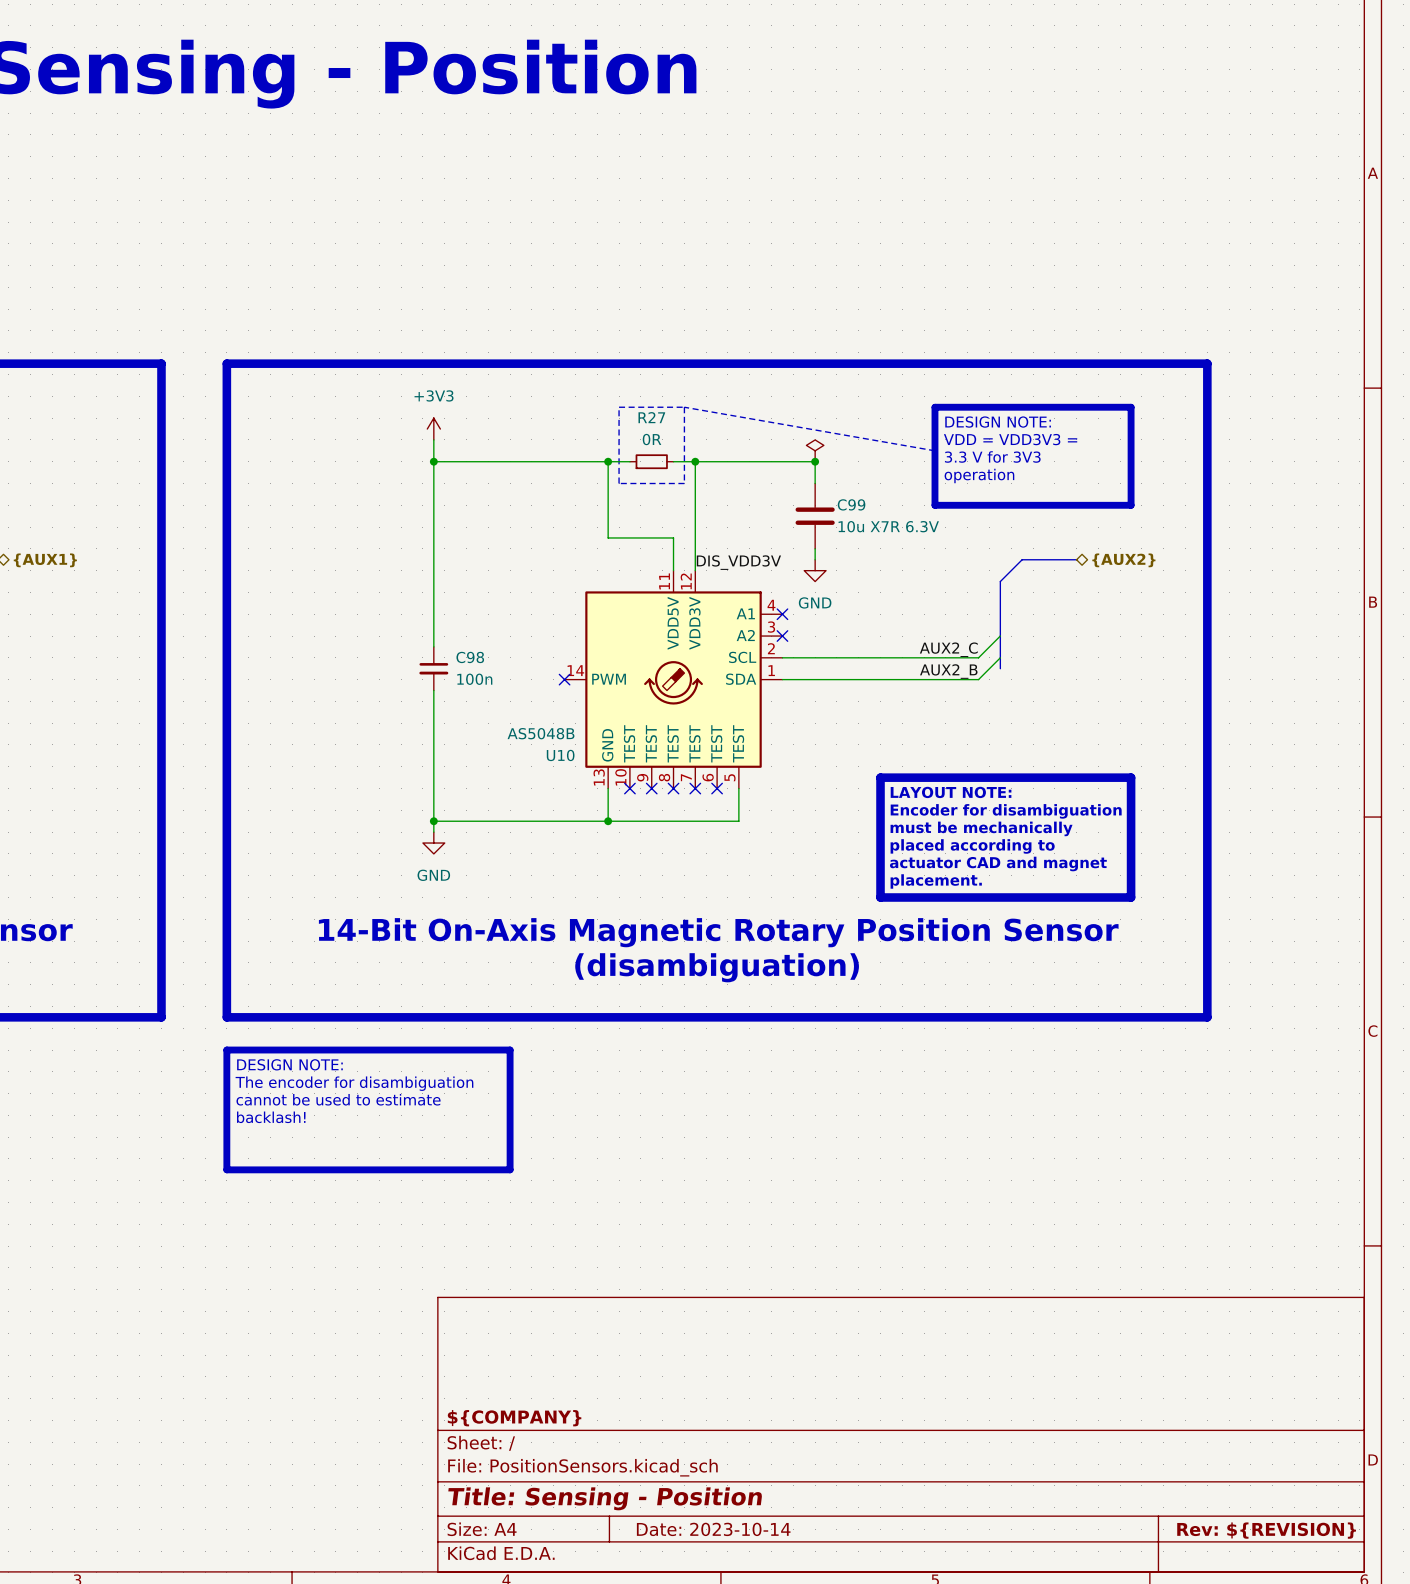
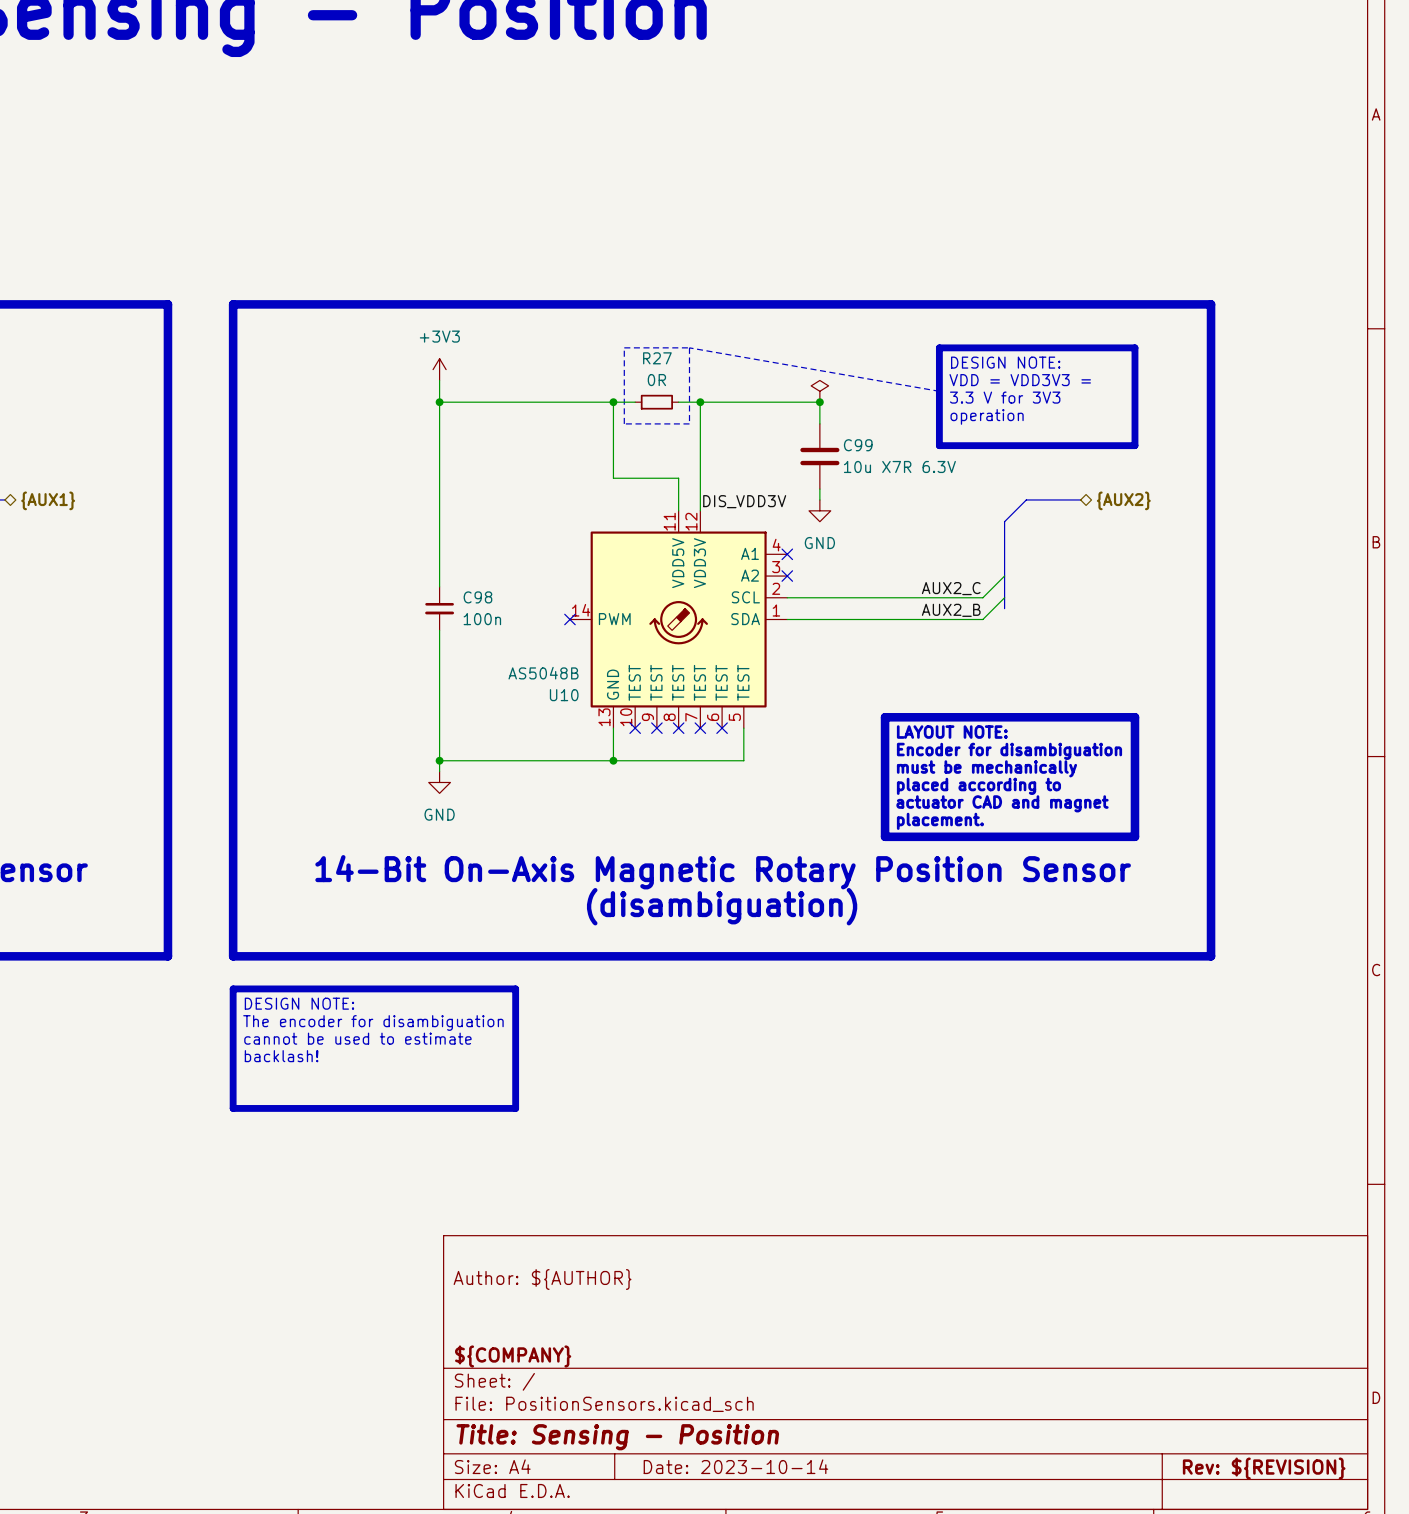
title block: none -> Author: ${AUTHOR} (542, 1279)

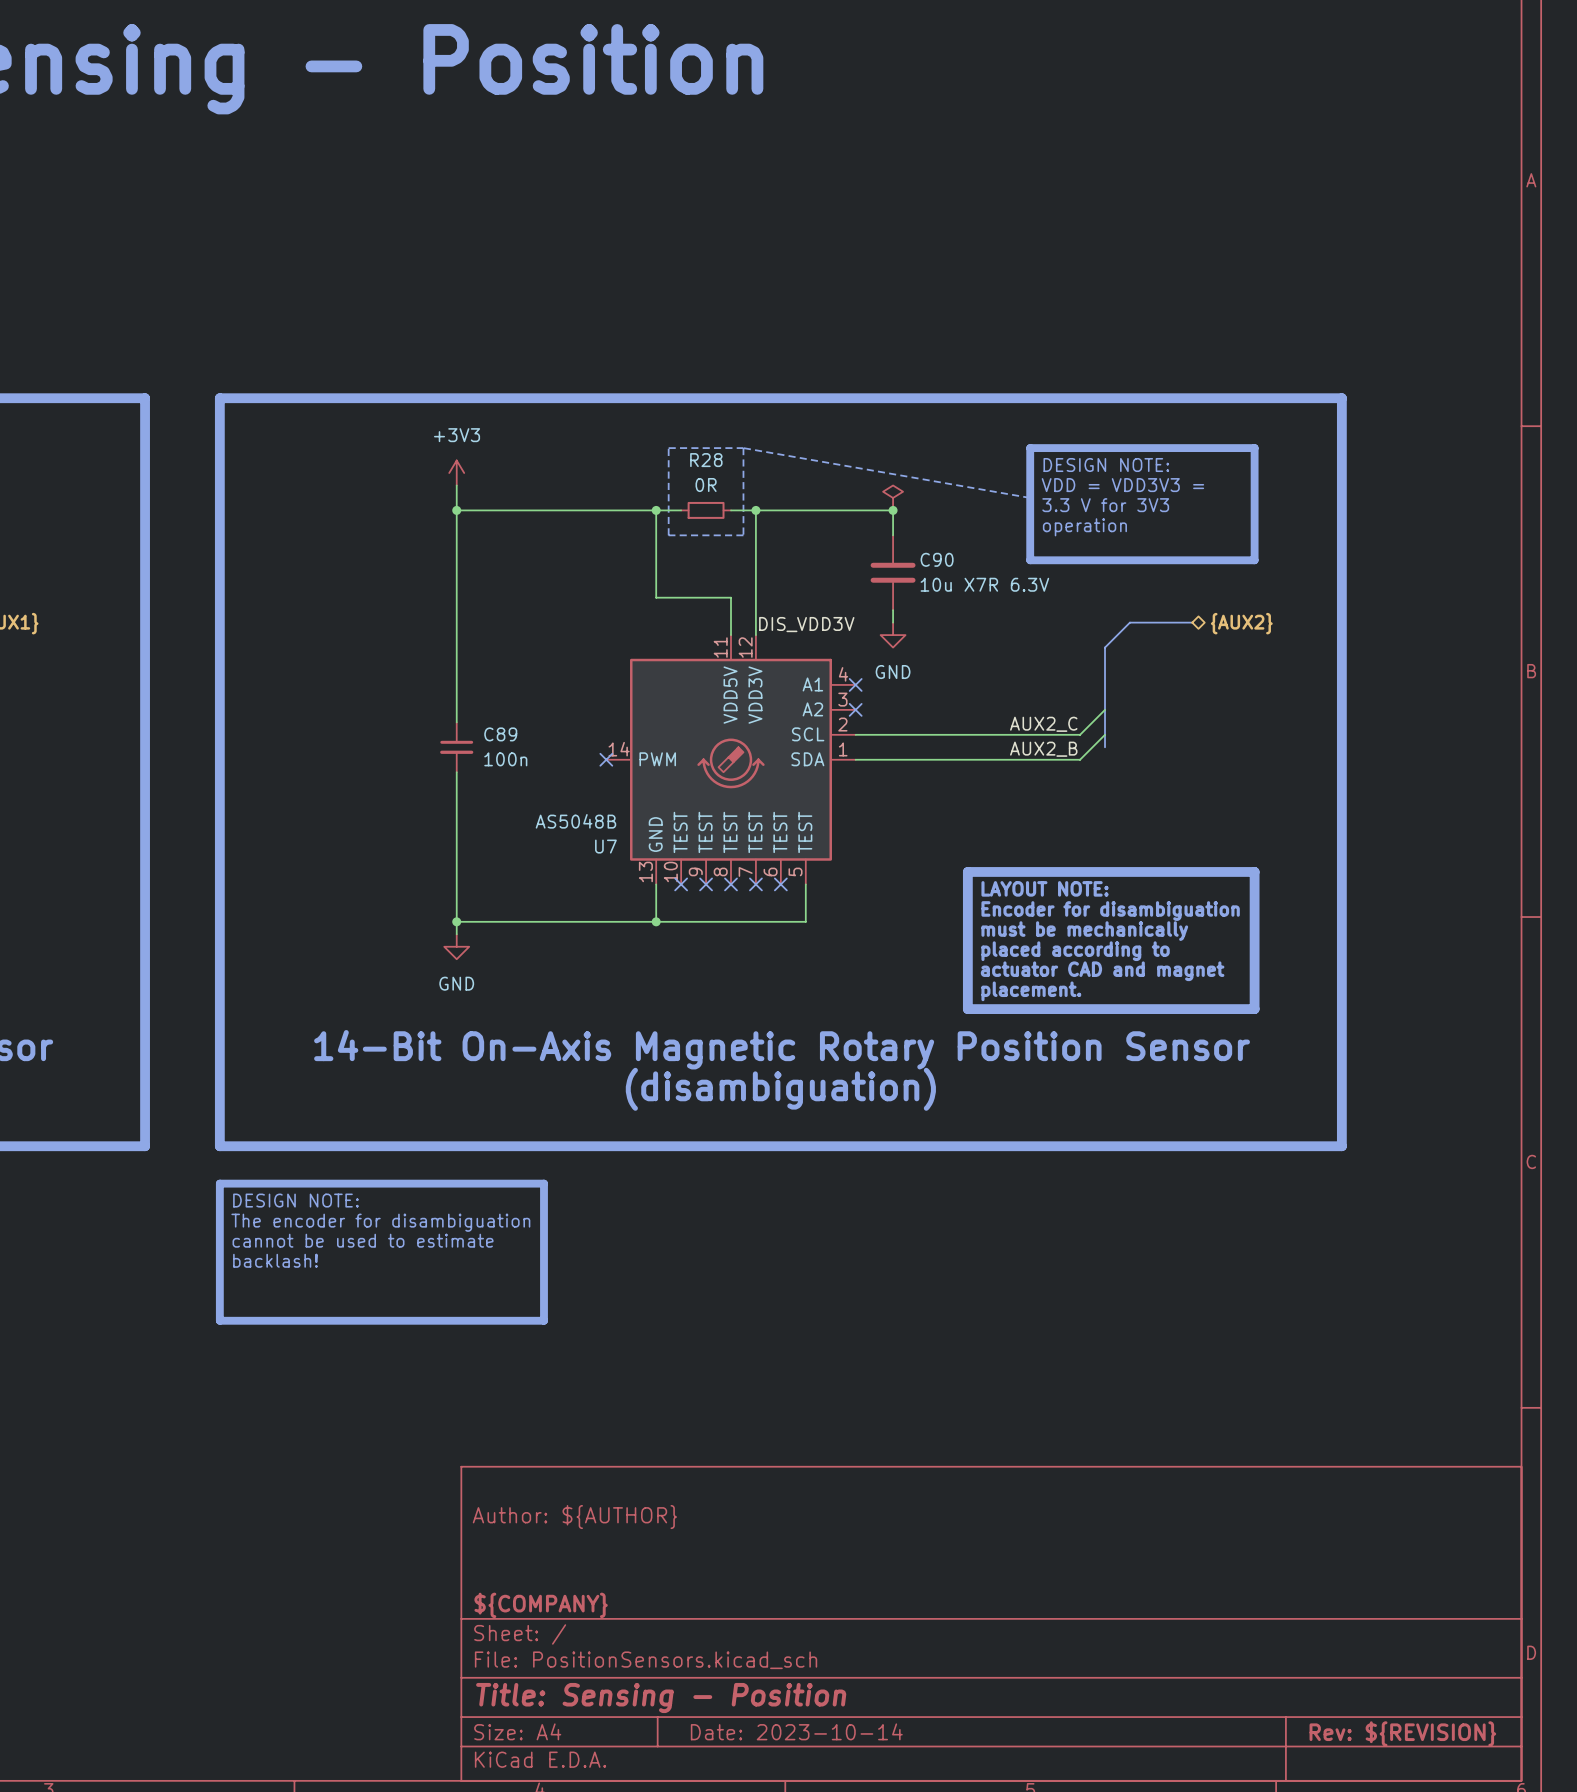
R27 name: R27 (657, 358) -> R28 (706, 460)
C99 name: C99 (858, 445) -> C90 (937, 559)
C98 name: C98 (477, 597) -> C89 (500, 734)
U10 name: U10 (564, 695) -> U7 (605, 846)

